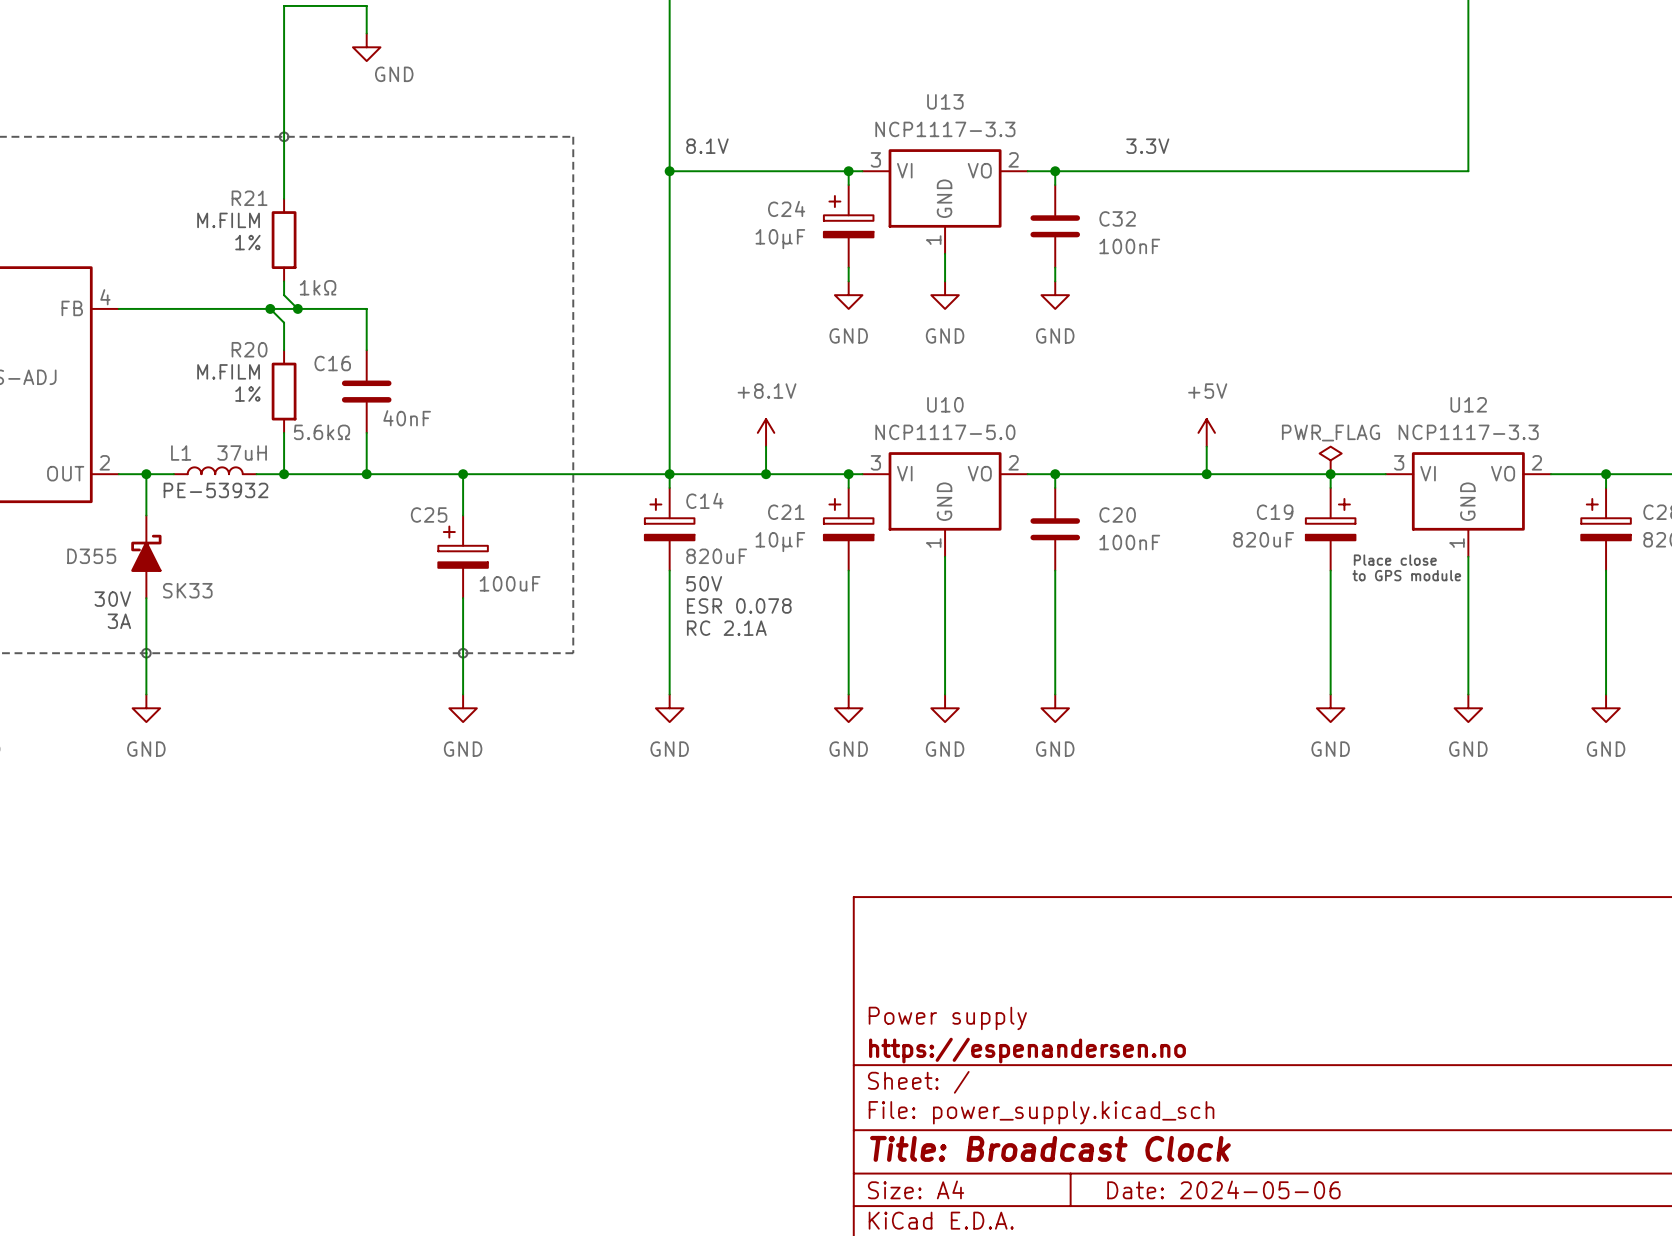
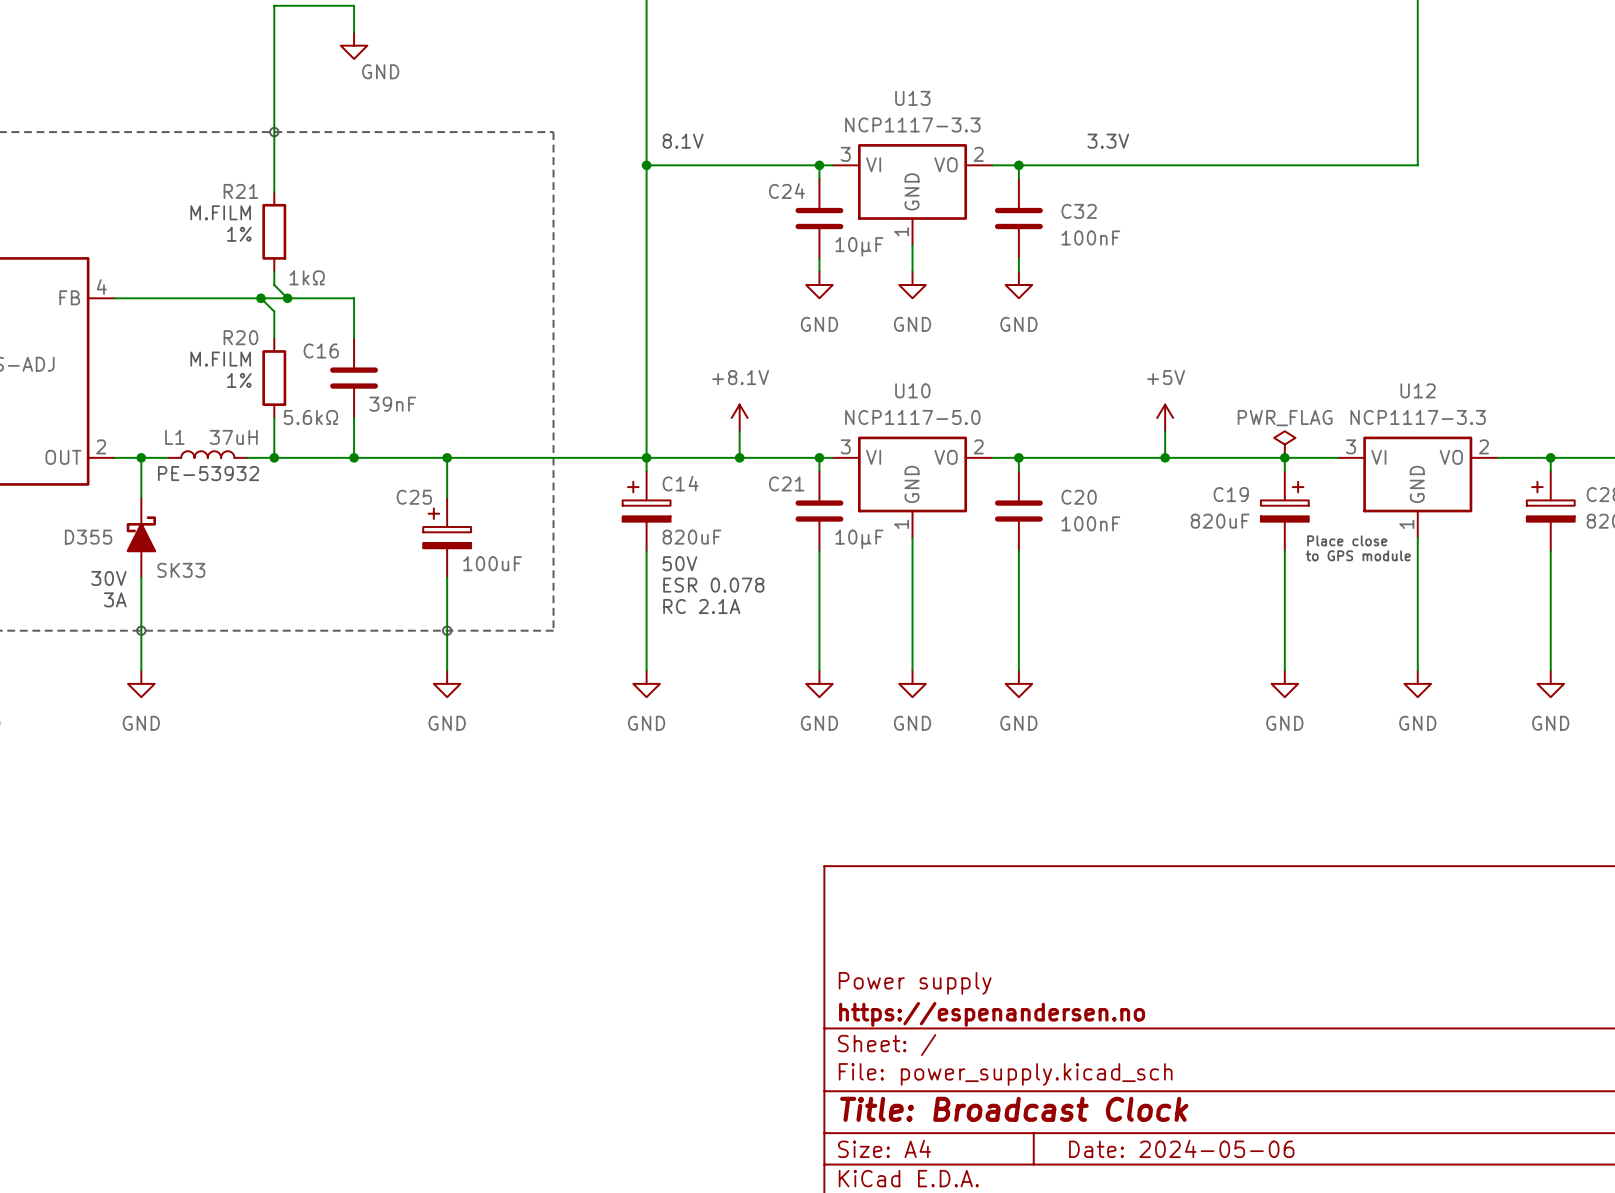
C24 symbol: [823, 185, 874, 268] -> [795, 178, 844, 259]
C24 name position: C24 (786, 208) -> C24 (786, 191)
C24 value position: 10µF (780, 239) -> 10µF (859, 246)
C16 value: 40nF (407, 418) -> 39nF (392, 404)
C21 symbol: [823, 487, 874, 571] -> [795, 471, 844, 551]
C21 name position: C21 (786, 512) -> C21 (786, 483)
C21 value position: 10µF (780, 542) -> 10µF (859, 539)

